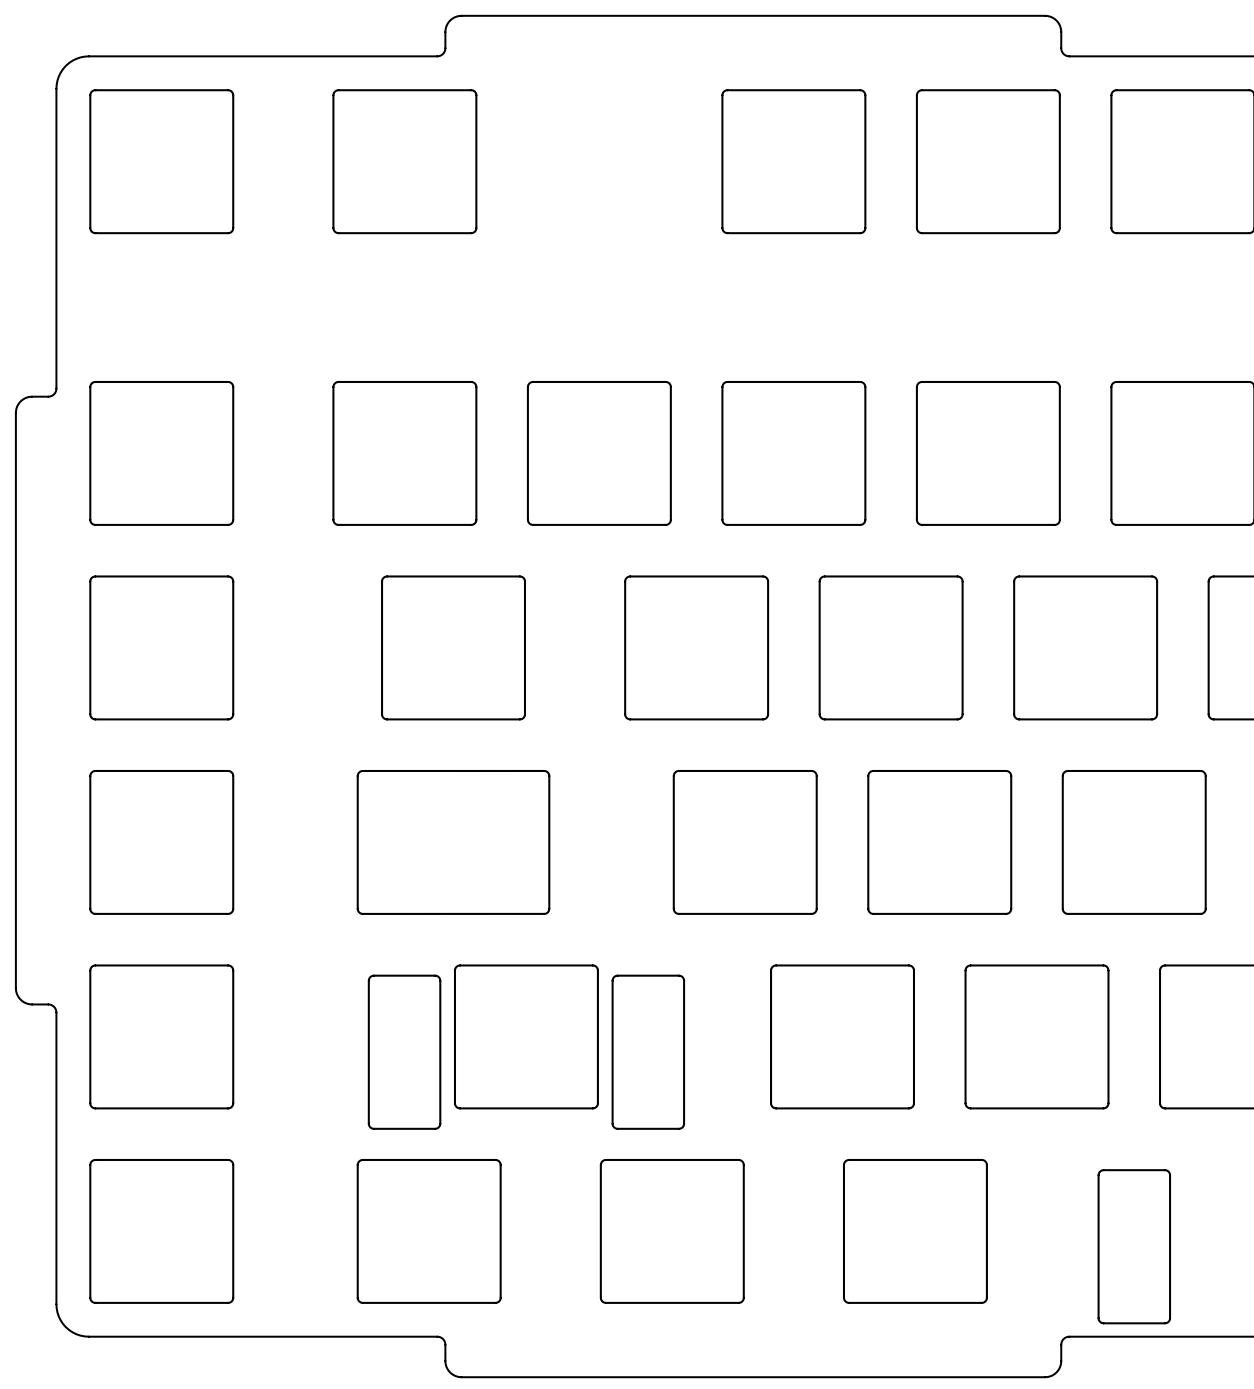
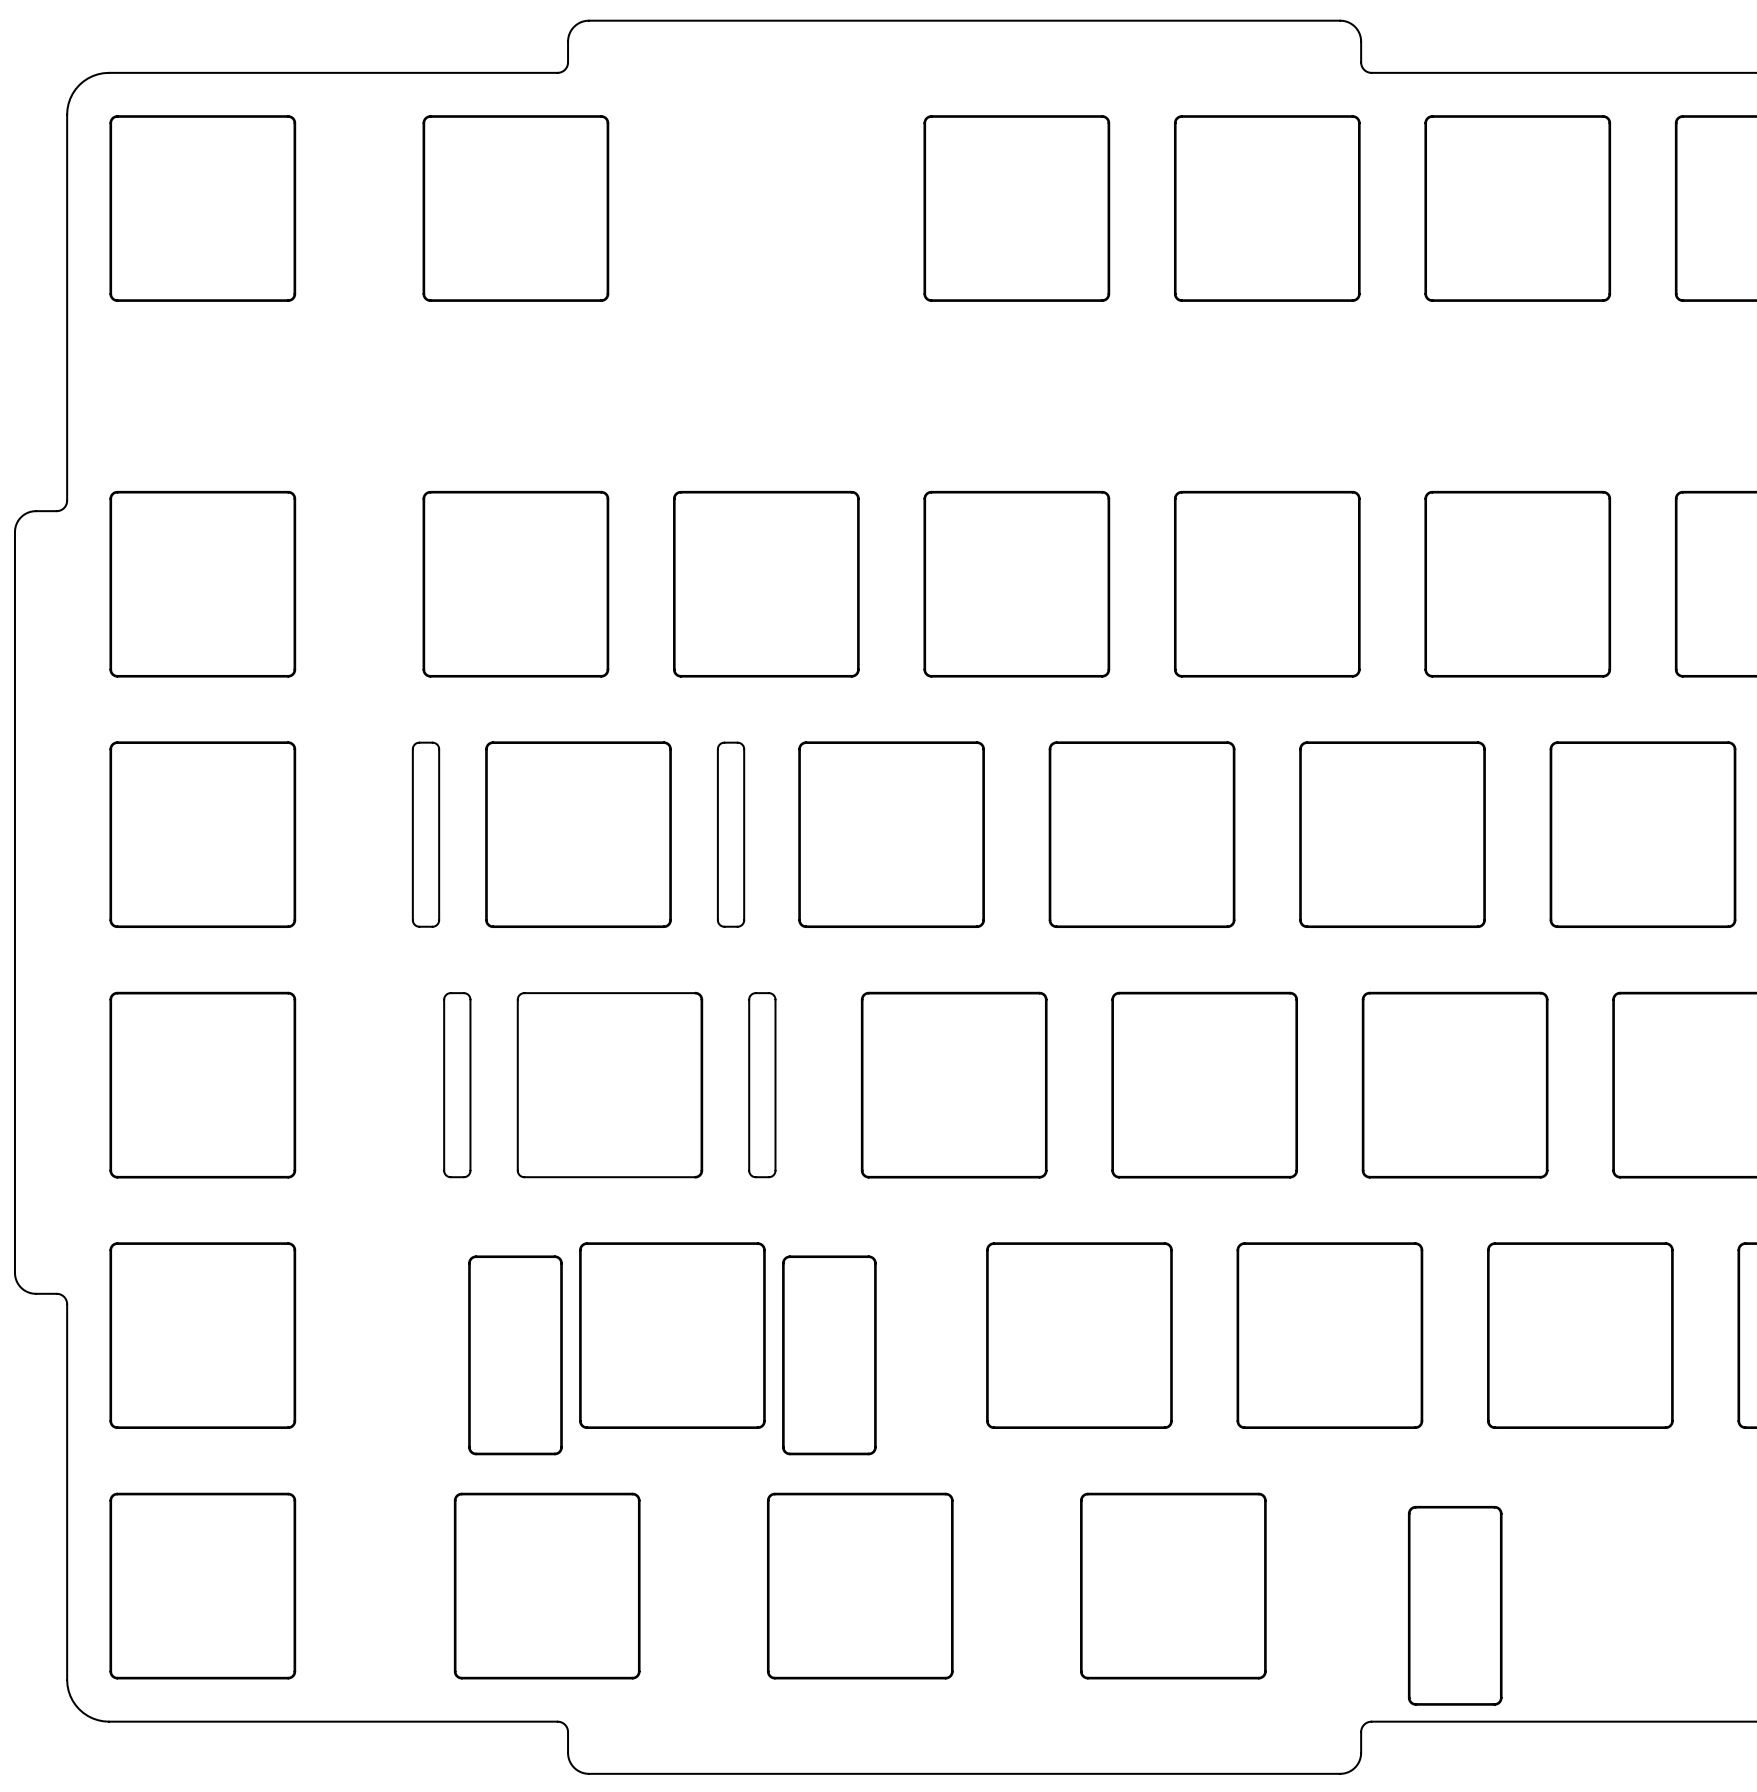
board edge: none -> (419, 742) (434, 742) (439, 748) (439, 920) (437, 924) (433, 926) (417, 926) (412, 921) (412, 749) (414, 744) (419, 742)
board edge: none -> (724, 742) (739, 742) (744, 748) (744, 920) (742, 924) (738, 926) (722, 926) (717, 921) (717, 749) (719, 744) (724, 742)
board edge: none -> (450, 993) (465, 993) (470, 998) (470, 1170) (469, 1174) (464, 1177) (449, 1176) (444, 1171) (444, 999) (446, 995) (450, 993)
board edge: (544, 770) (362, 770) (357, 776) (357, 908) (359, 912) (544, 913) -> (695, 993) (524, 993) (519, 995) (517, 999) (517, 1170) (519, 1175) (524, 1177) (695, 1177)
board edge: none -> (755, 993) (770, 993) (775, 998) (775, 1170) (773, 1175) (769, 1177) (754, 1176) (749, 1171) (749, 999) (751, 995) (755, 993)

